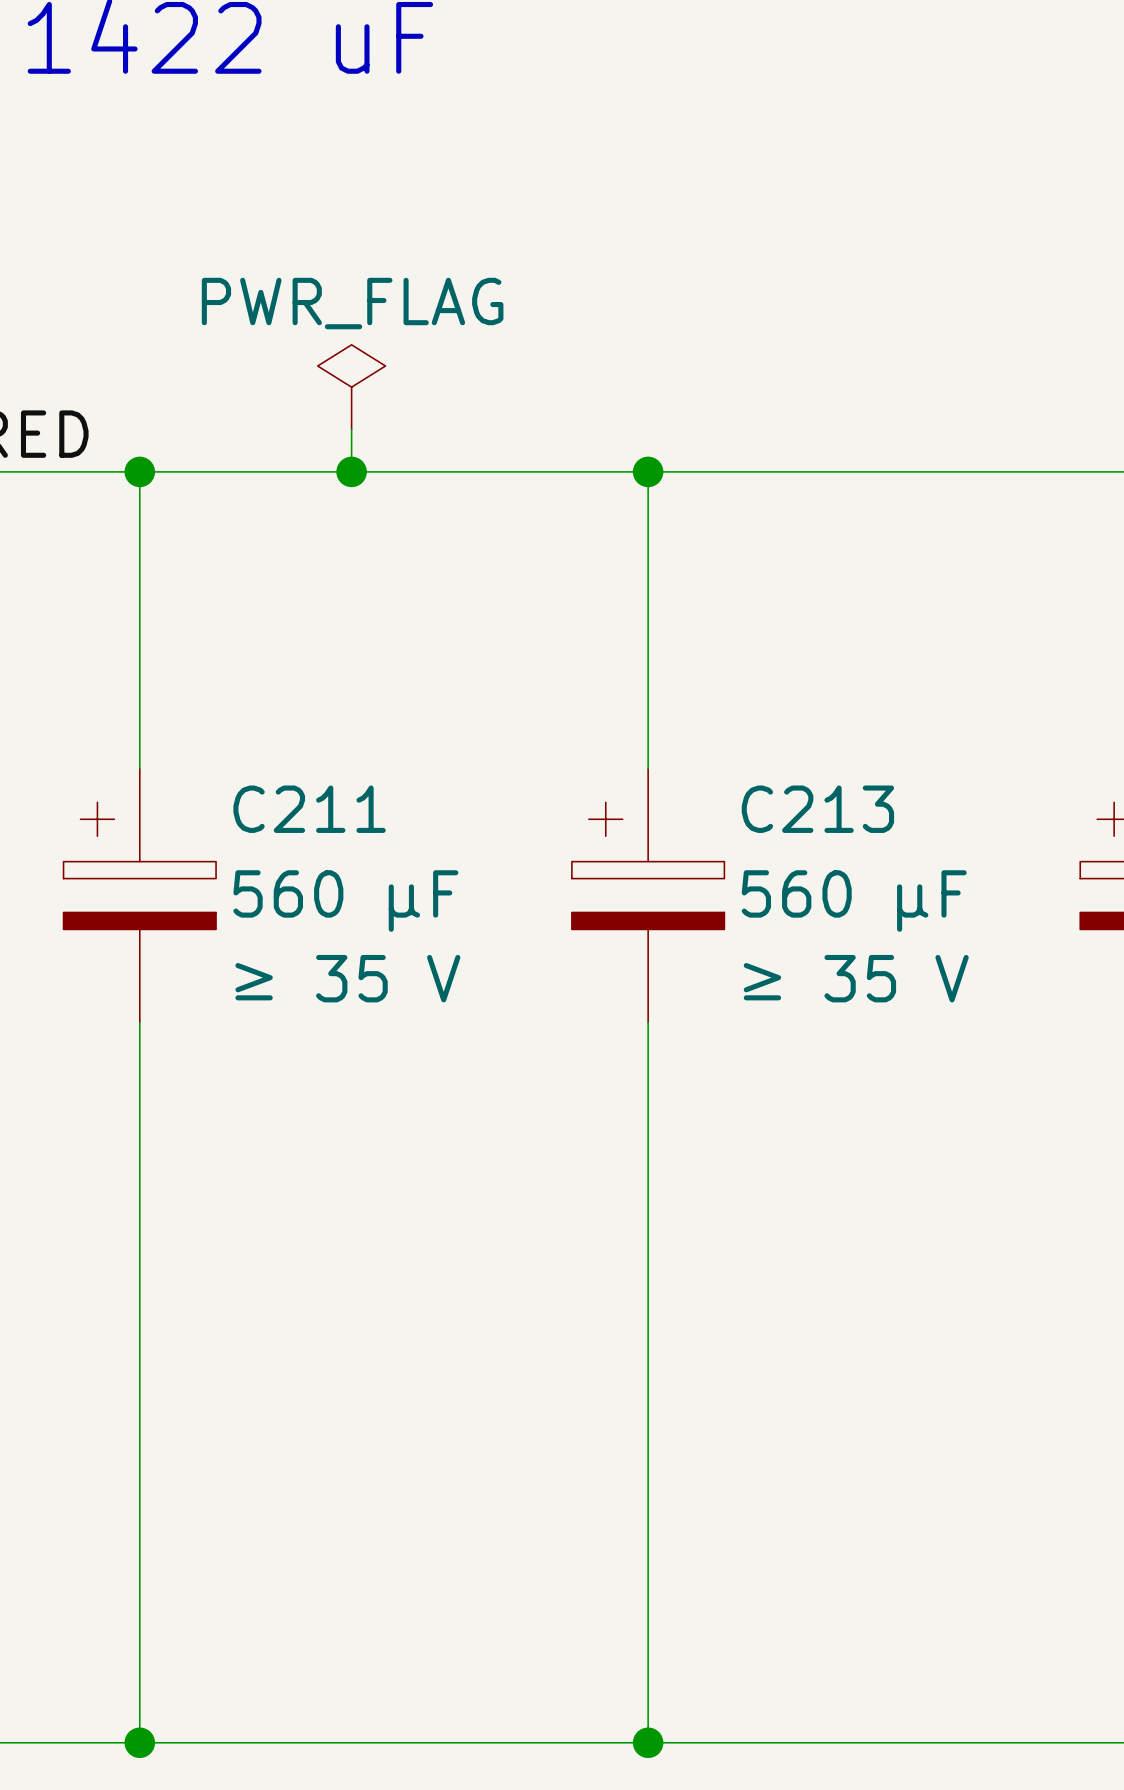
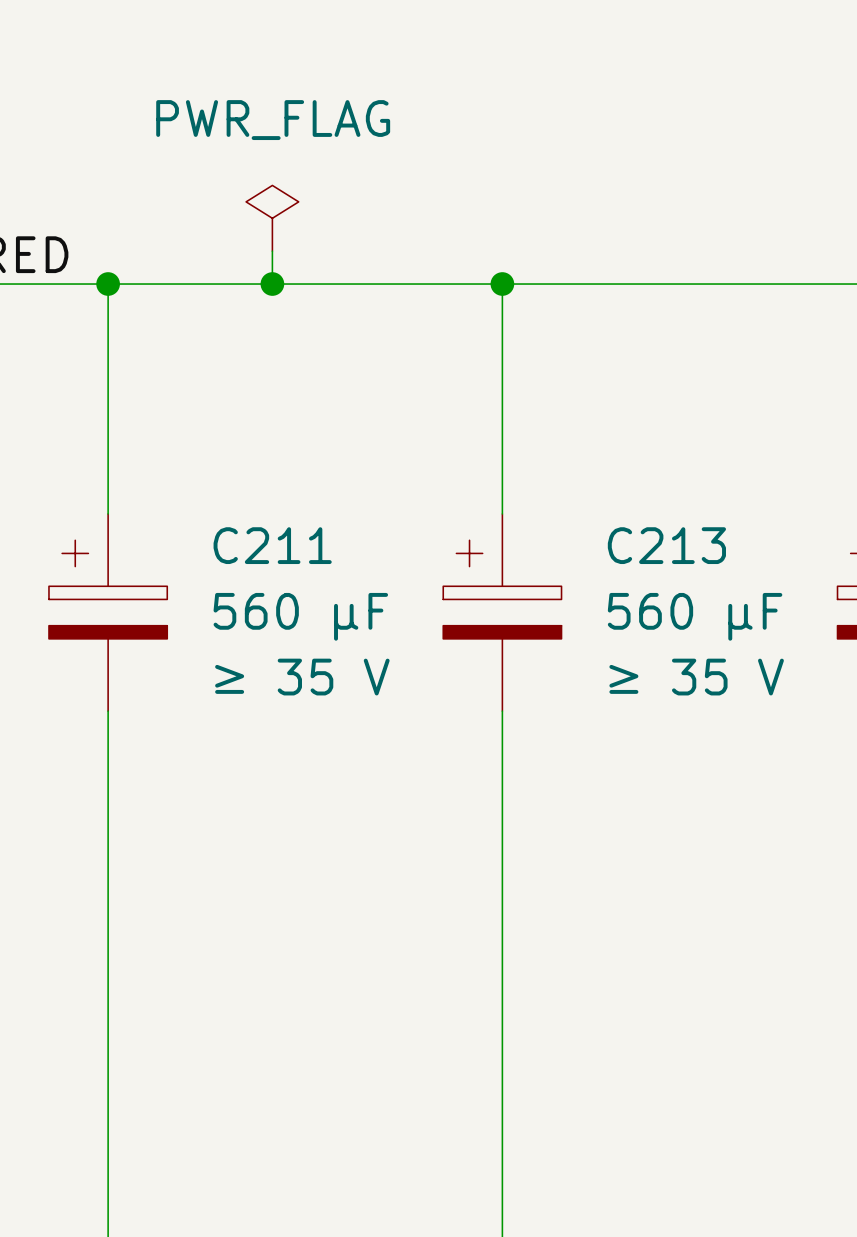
power symbol text position: PWR_FLAG (352, 303) -> PWR_FLAG (273, 120)
C211 name position: C211 (309, 809) -> C211 (272, 545)
C213 name position: C213 (817, 809) -> C213 (666, 545)
C211 value position: 560 µF (345, 901) -> 560 µF (300, 616)
C213 value position: 560 µF (854, 901) -> 560 µF (695, 616)
C211 text position: ≥ 35 V (347, 978) -> ≥ 35 V (302, 677)
C213 text position: ≥ 35 V (856, 978) -> ≥ 35 V (696, 677)

